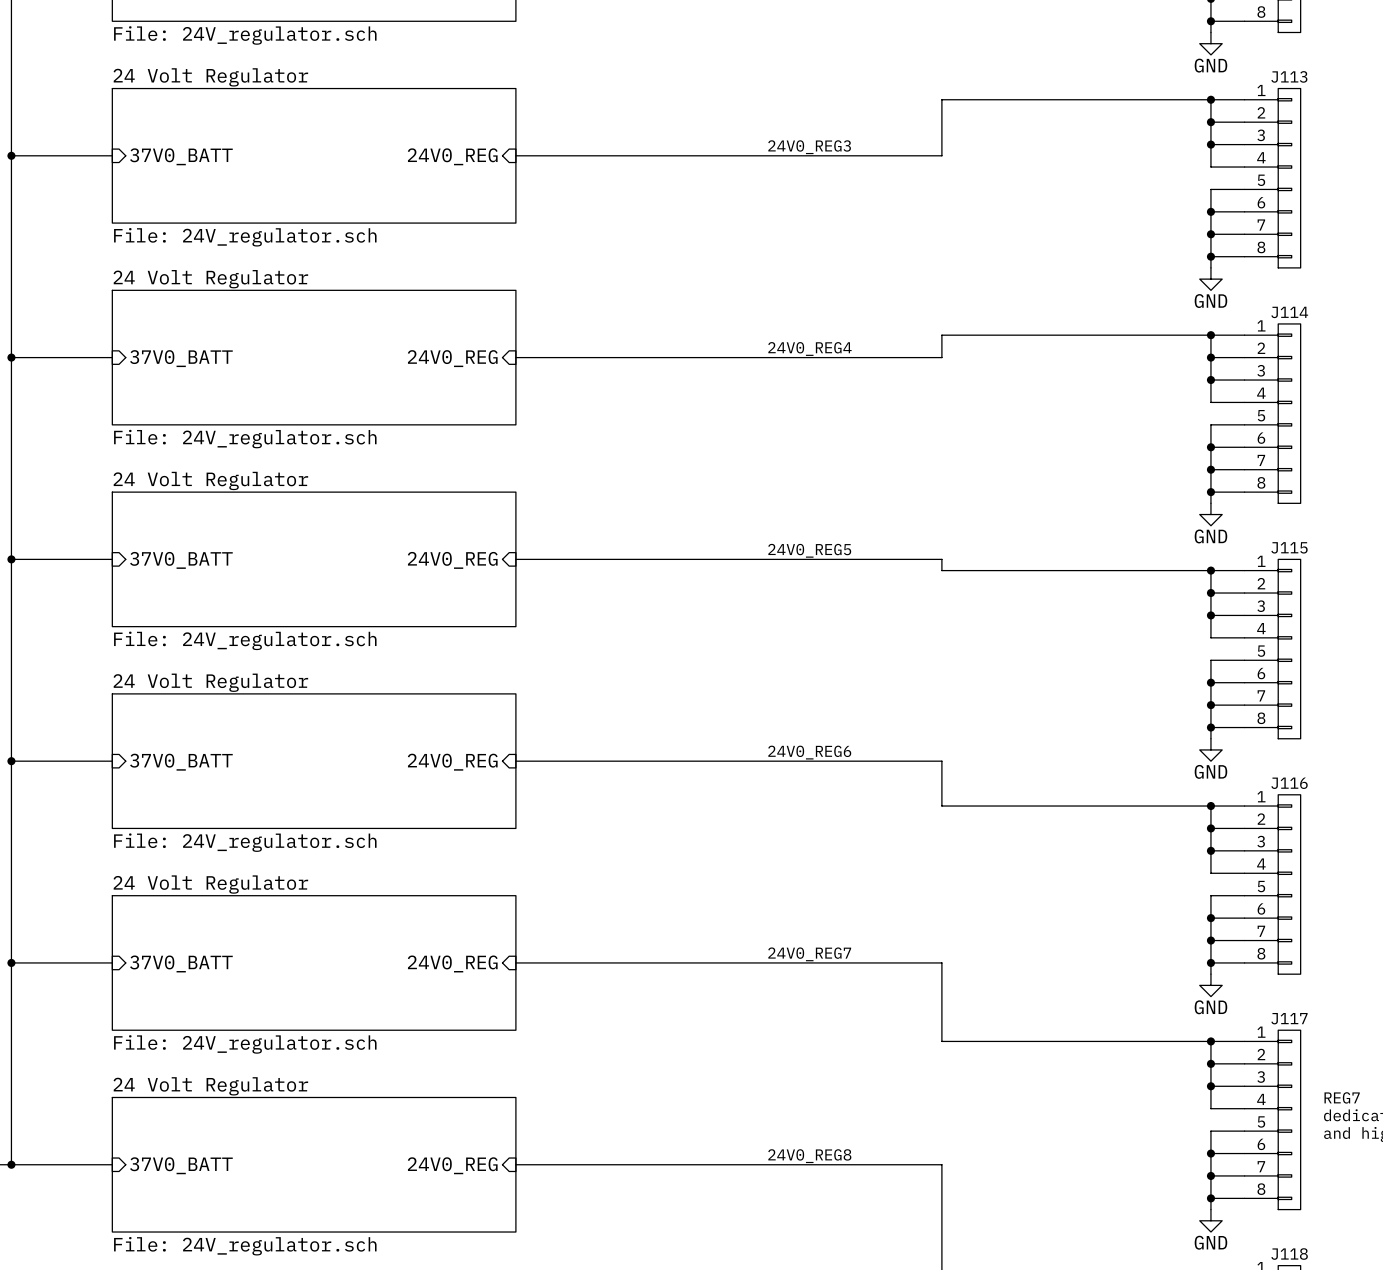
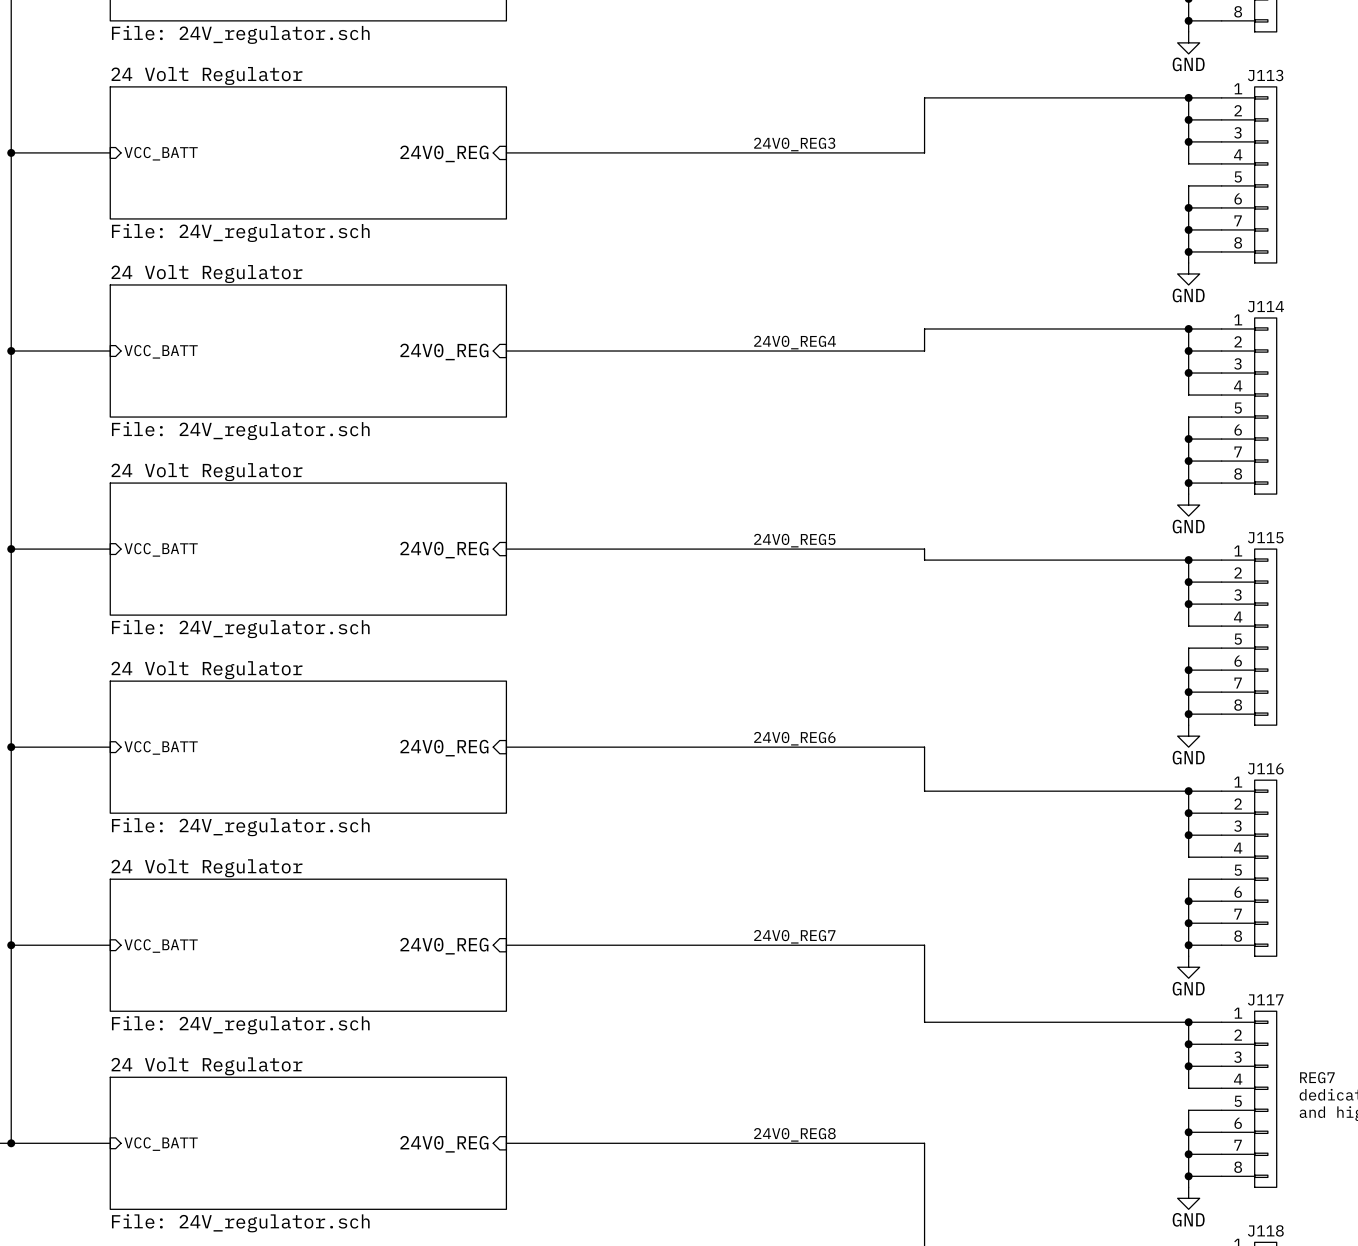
sheet pin: 37V0_BATT (181, 156) -> VCC_BATT (161, 153)
sheet pin: 37V0_BATT (181, 358) -> VCC_BATT (161, 351)
sheet pin: 37V0_BATT (181, 560) -> VCC_BATT (161, 549)
sheet pin: 37V0_BATT (181, 762) -> VCC_BATT (161, 747)
sheet pin: 37V0_BATT (181, 963) -> VCC_BATT (161, 946)
sheet pin: 37V0_BATT (181, 1165) -> VCC_BATT (161, 1144)

